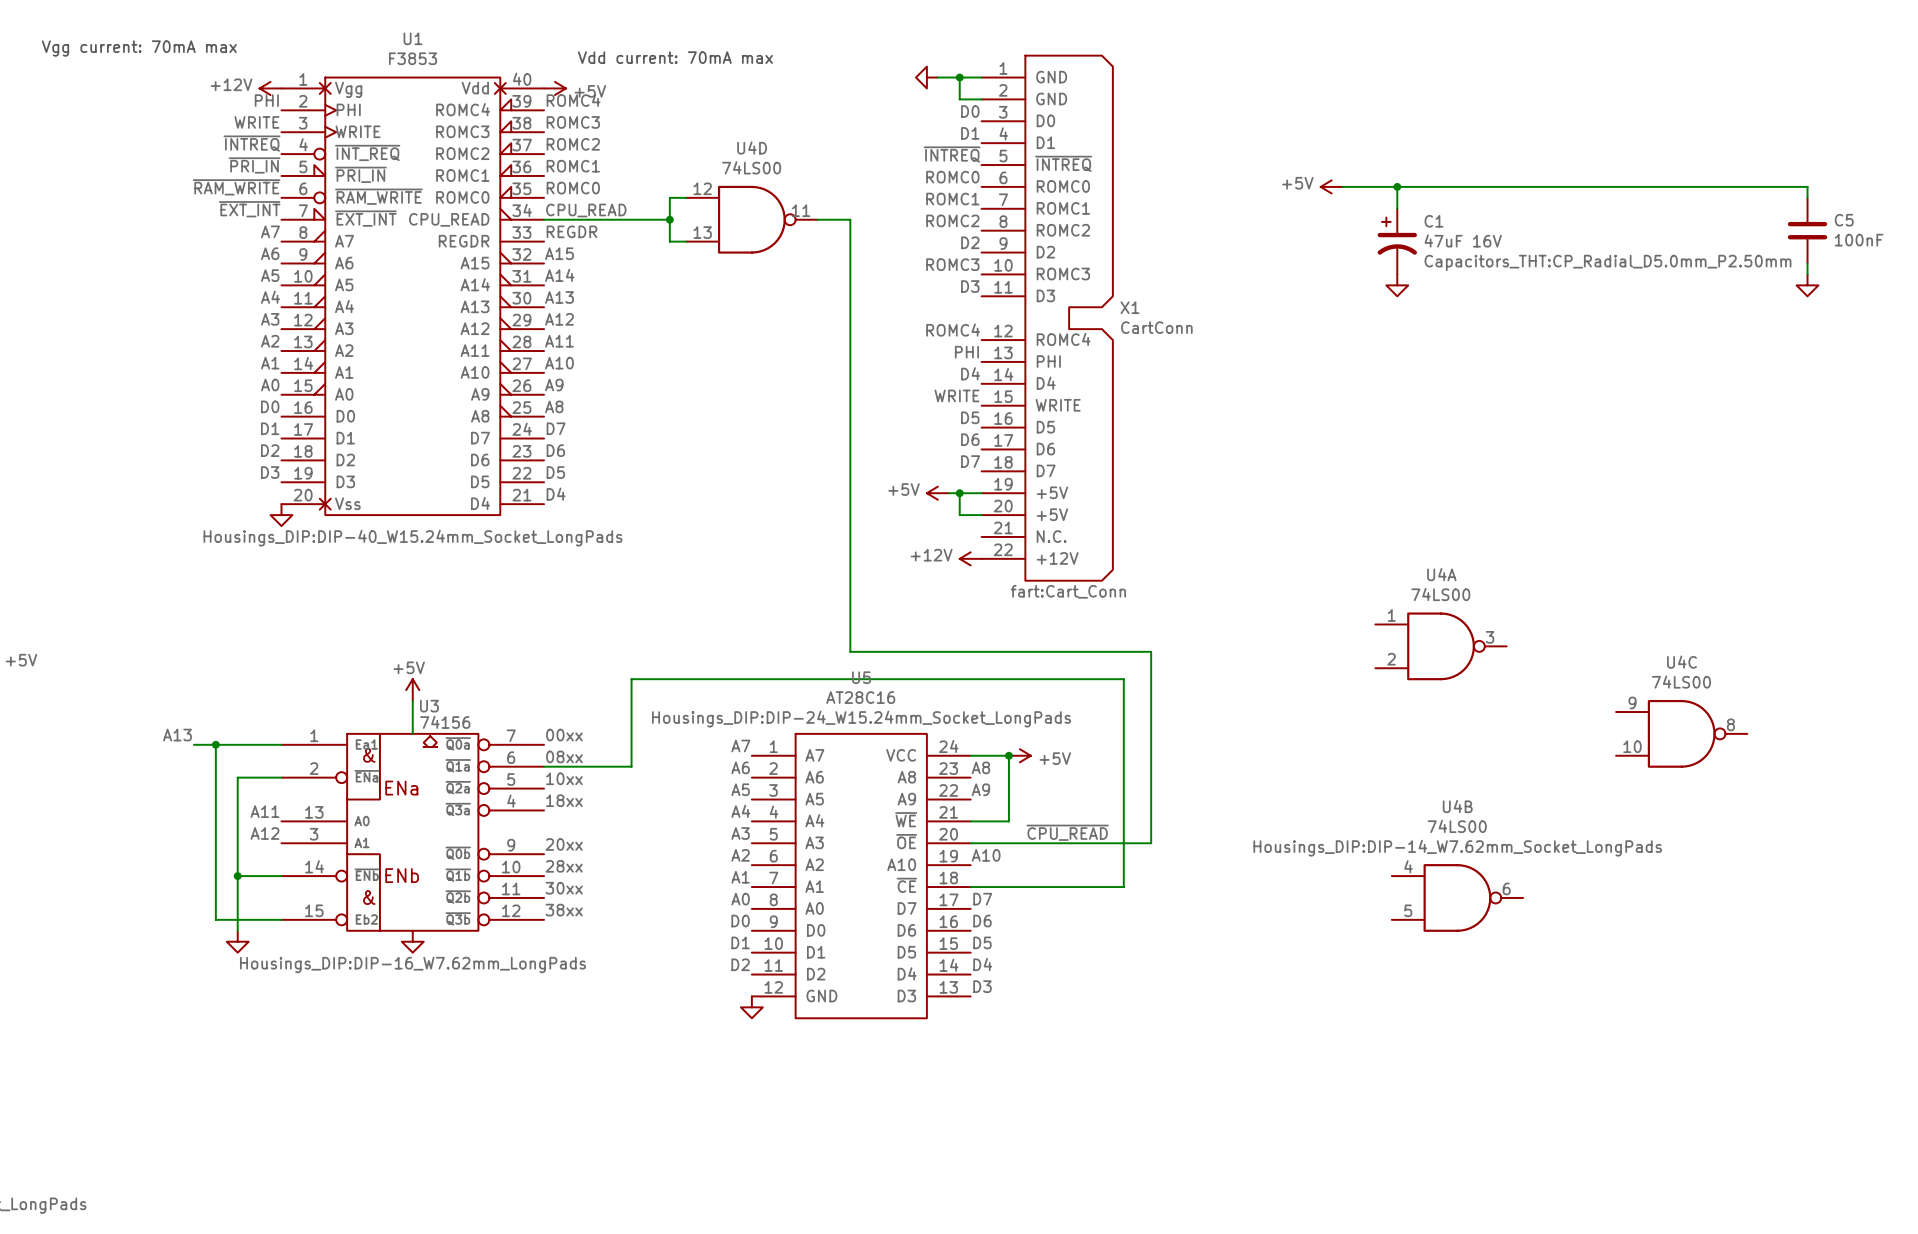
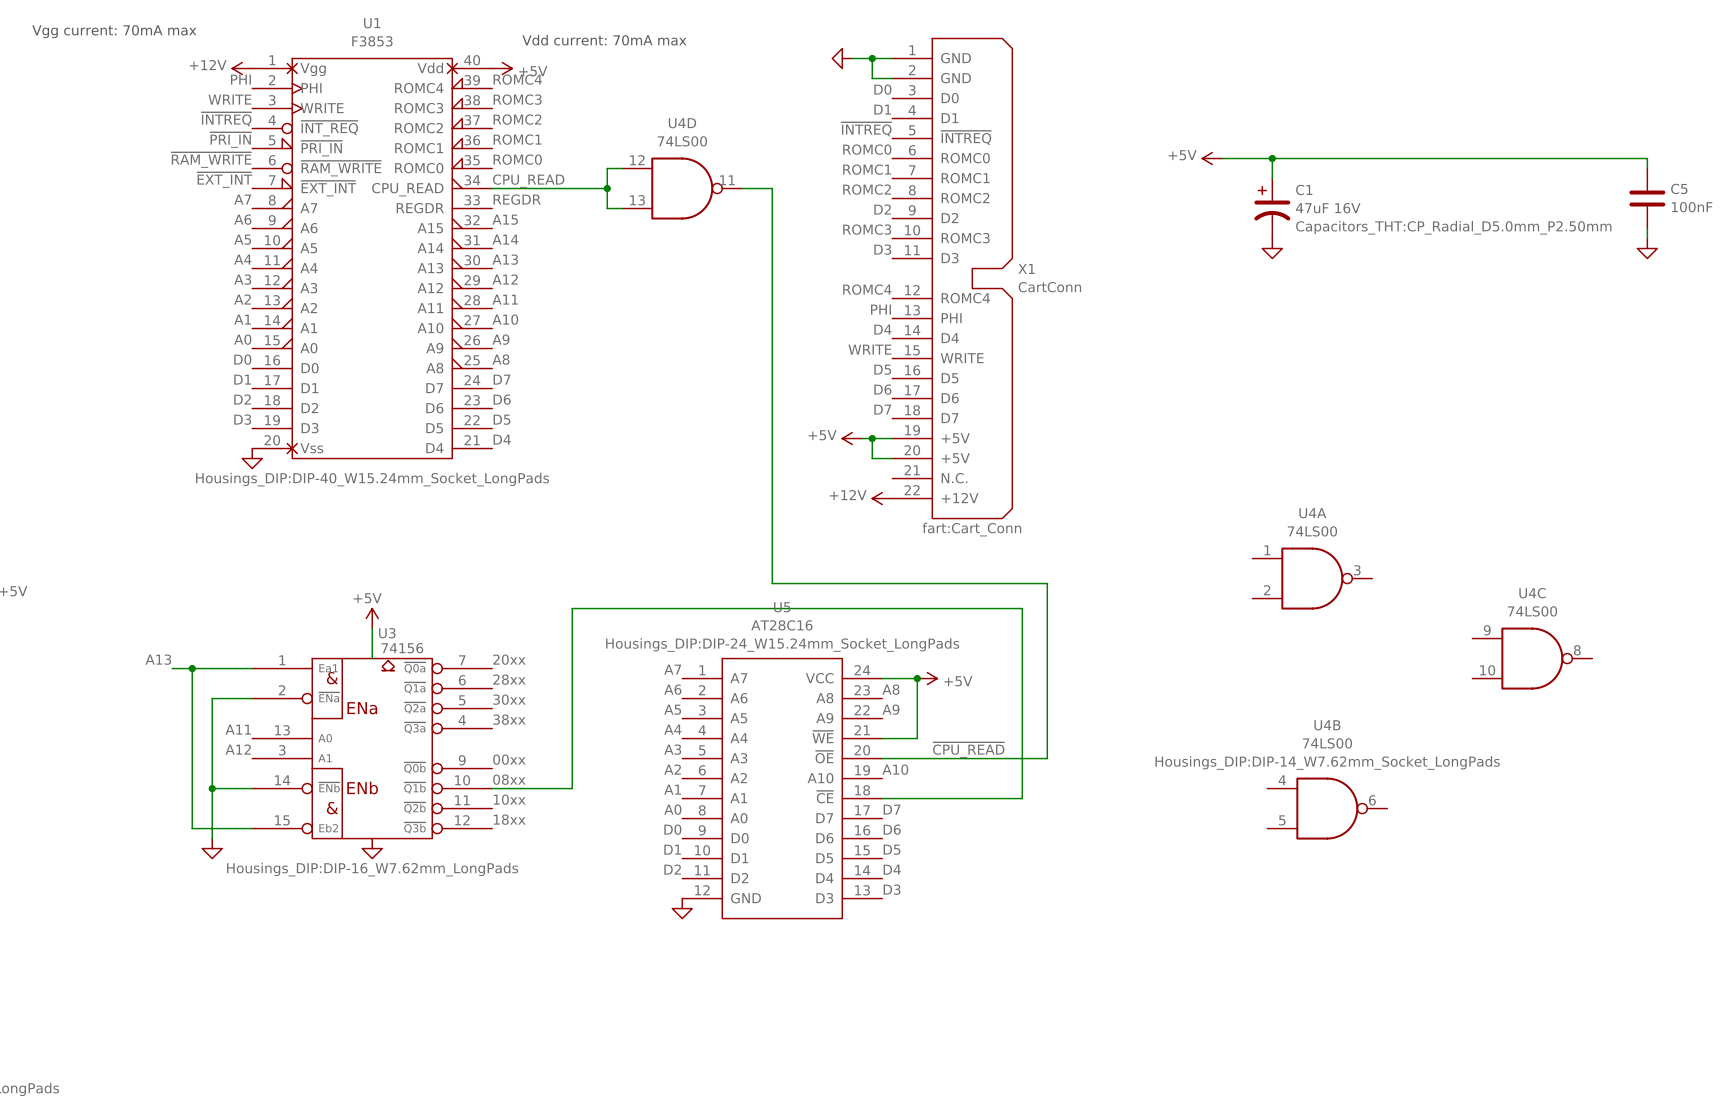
label: 00xx (564, 735) -> 20xx (509, 659)
label: 08xx (564, 756) -> 28xx (509, 679)
wire: (544, 766) (631, 766) -> (492, 788) (572, 788) (572, 688)
label: 10xx (564, 778) -> 30xx (509, 699)
label: 18xx (564, 800) -> 38xx (509, 719)
label: 20xx (564, 844) -> 00xx (509, 759)
label: 28xx (564, 866) -> 08xx (509, 779)
label: 30xx (564, 888) -> 10xx (509, 799)
label: 38xx (564, 910) -> 18xx (509, 819)

